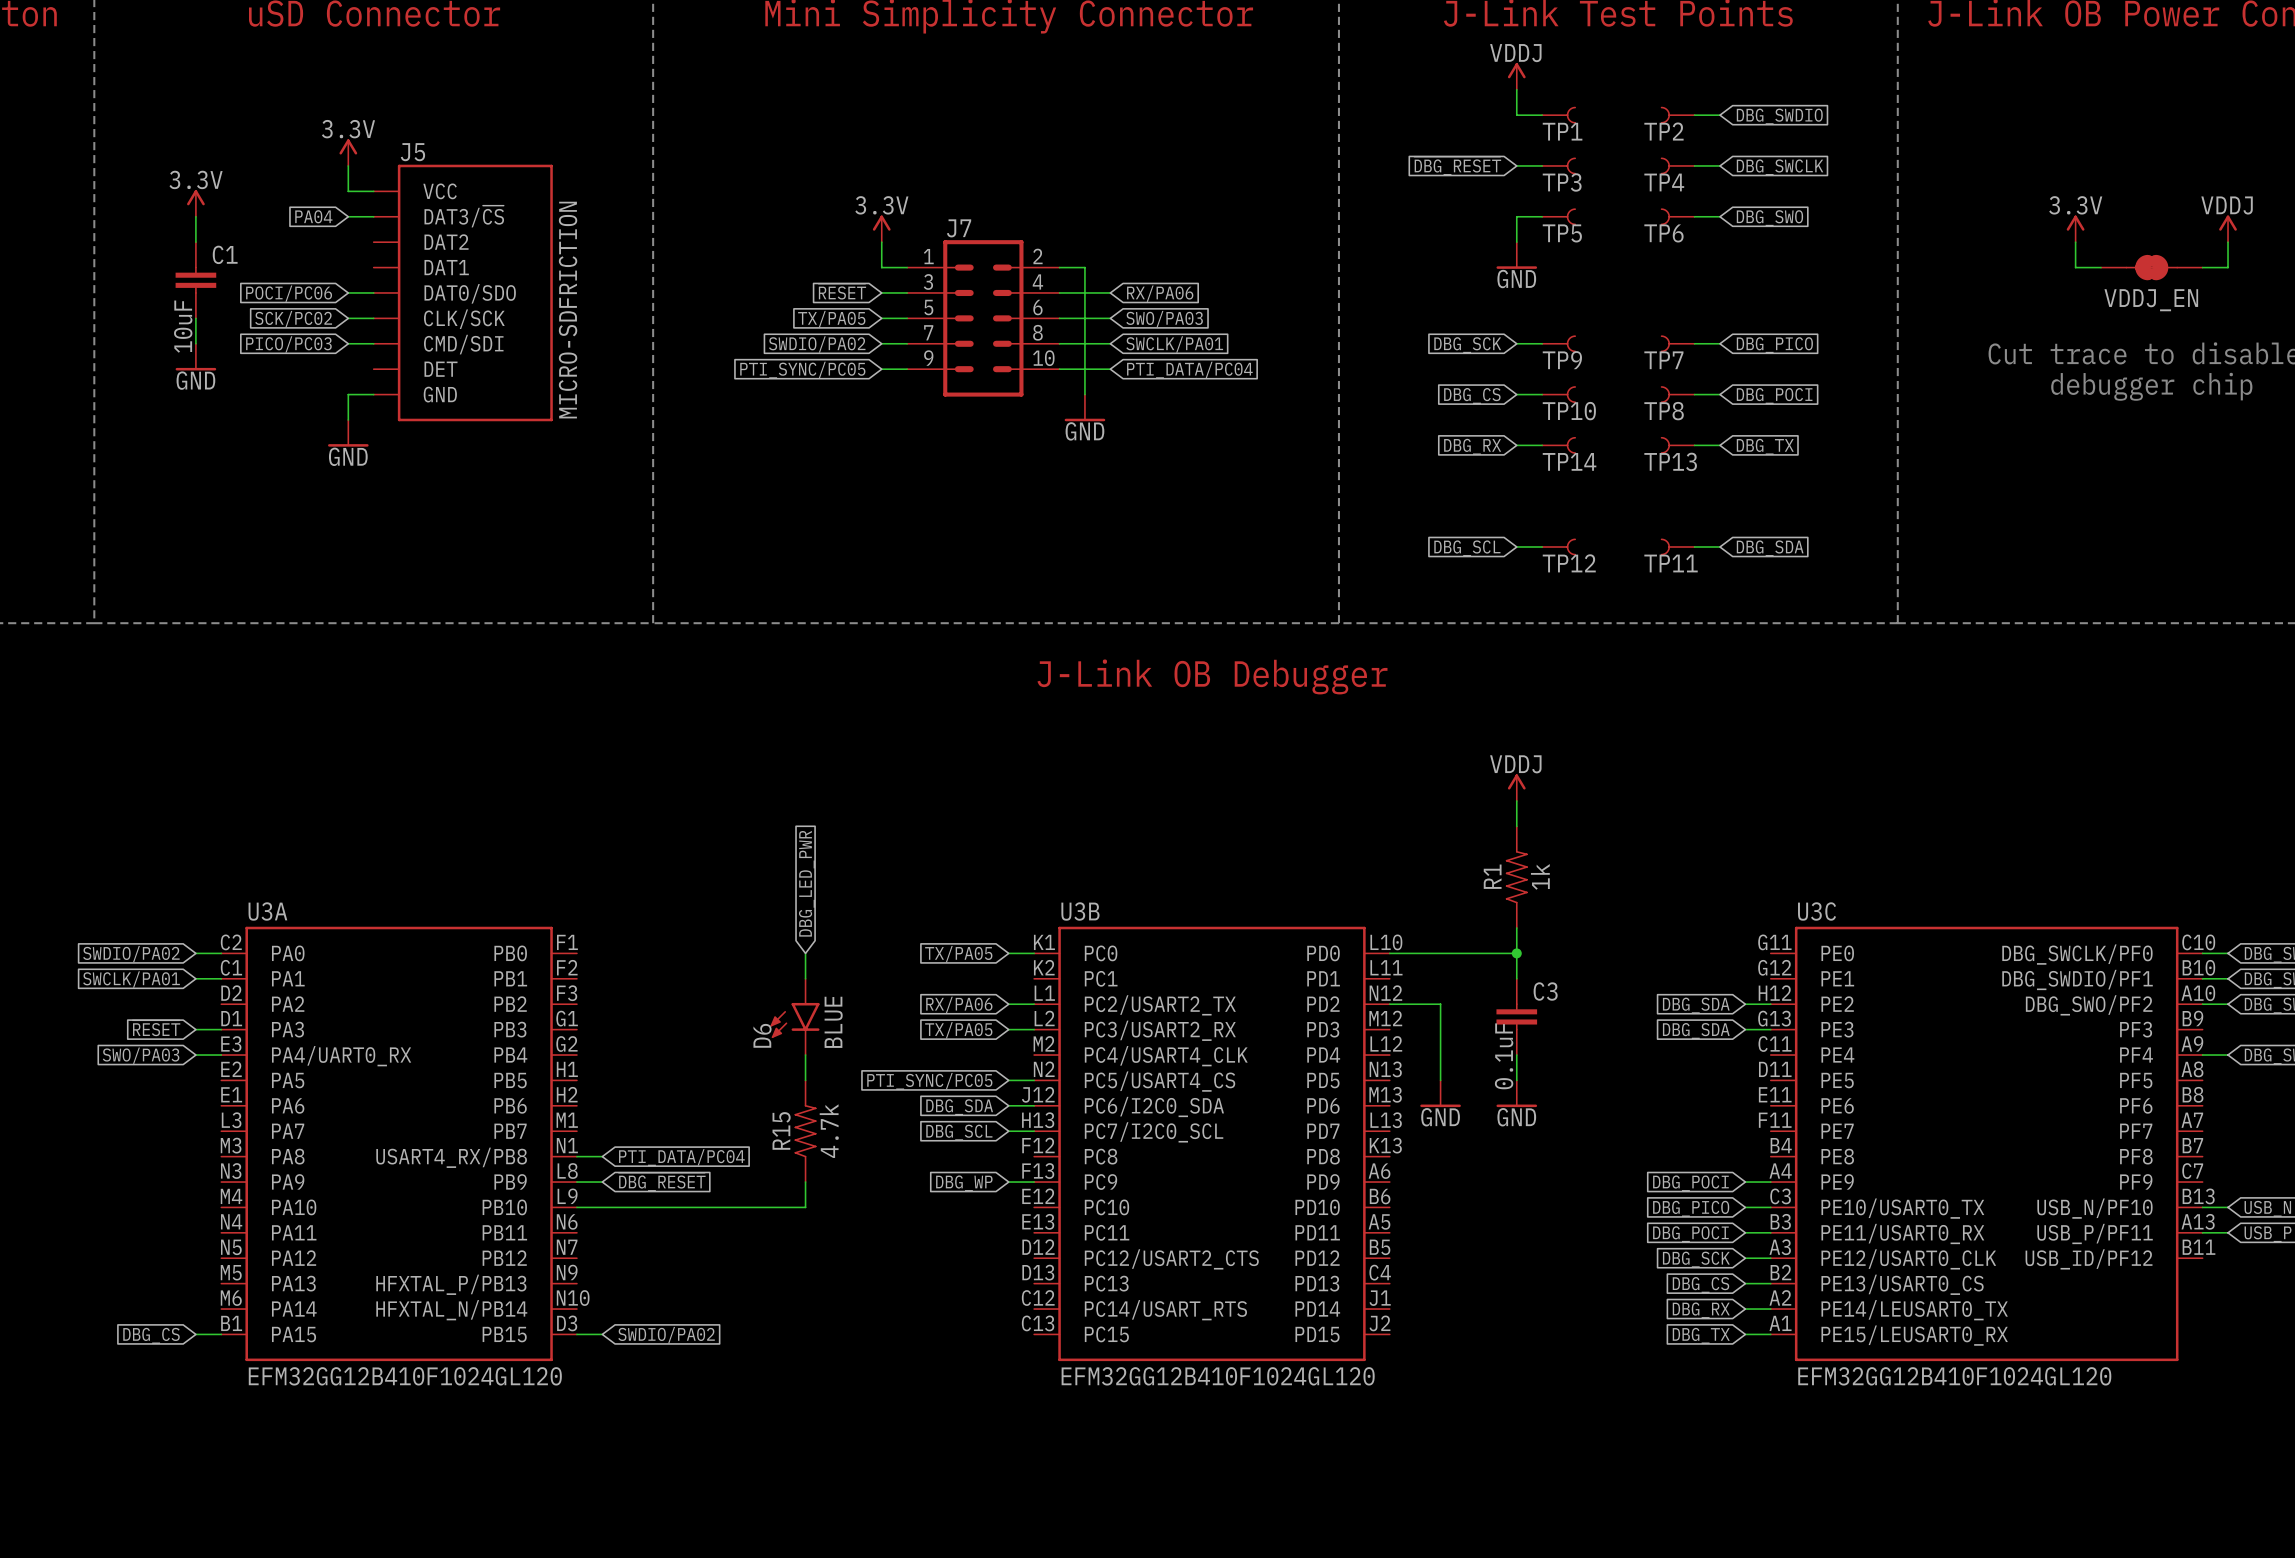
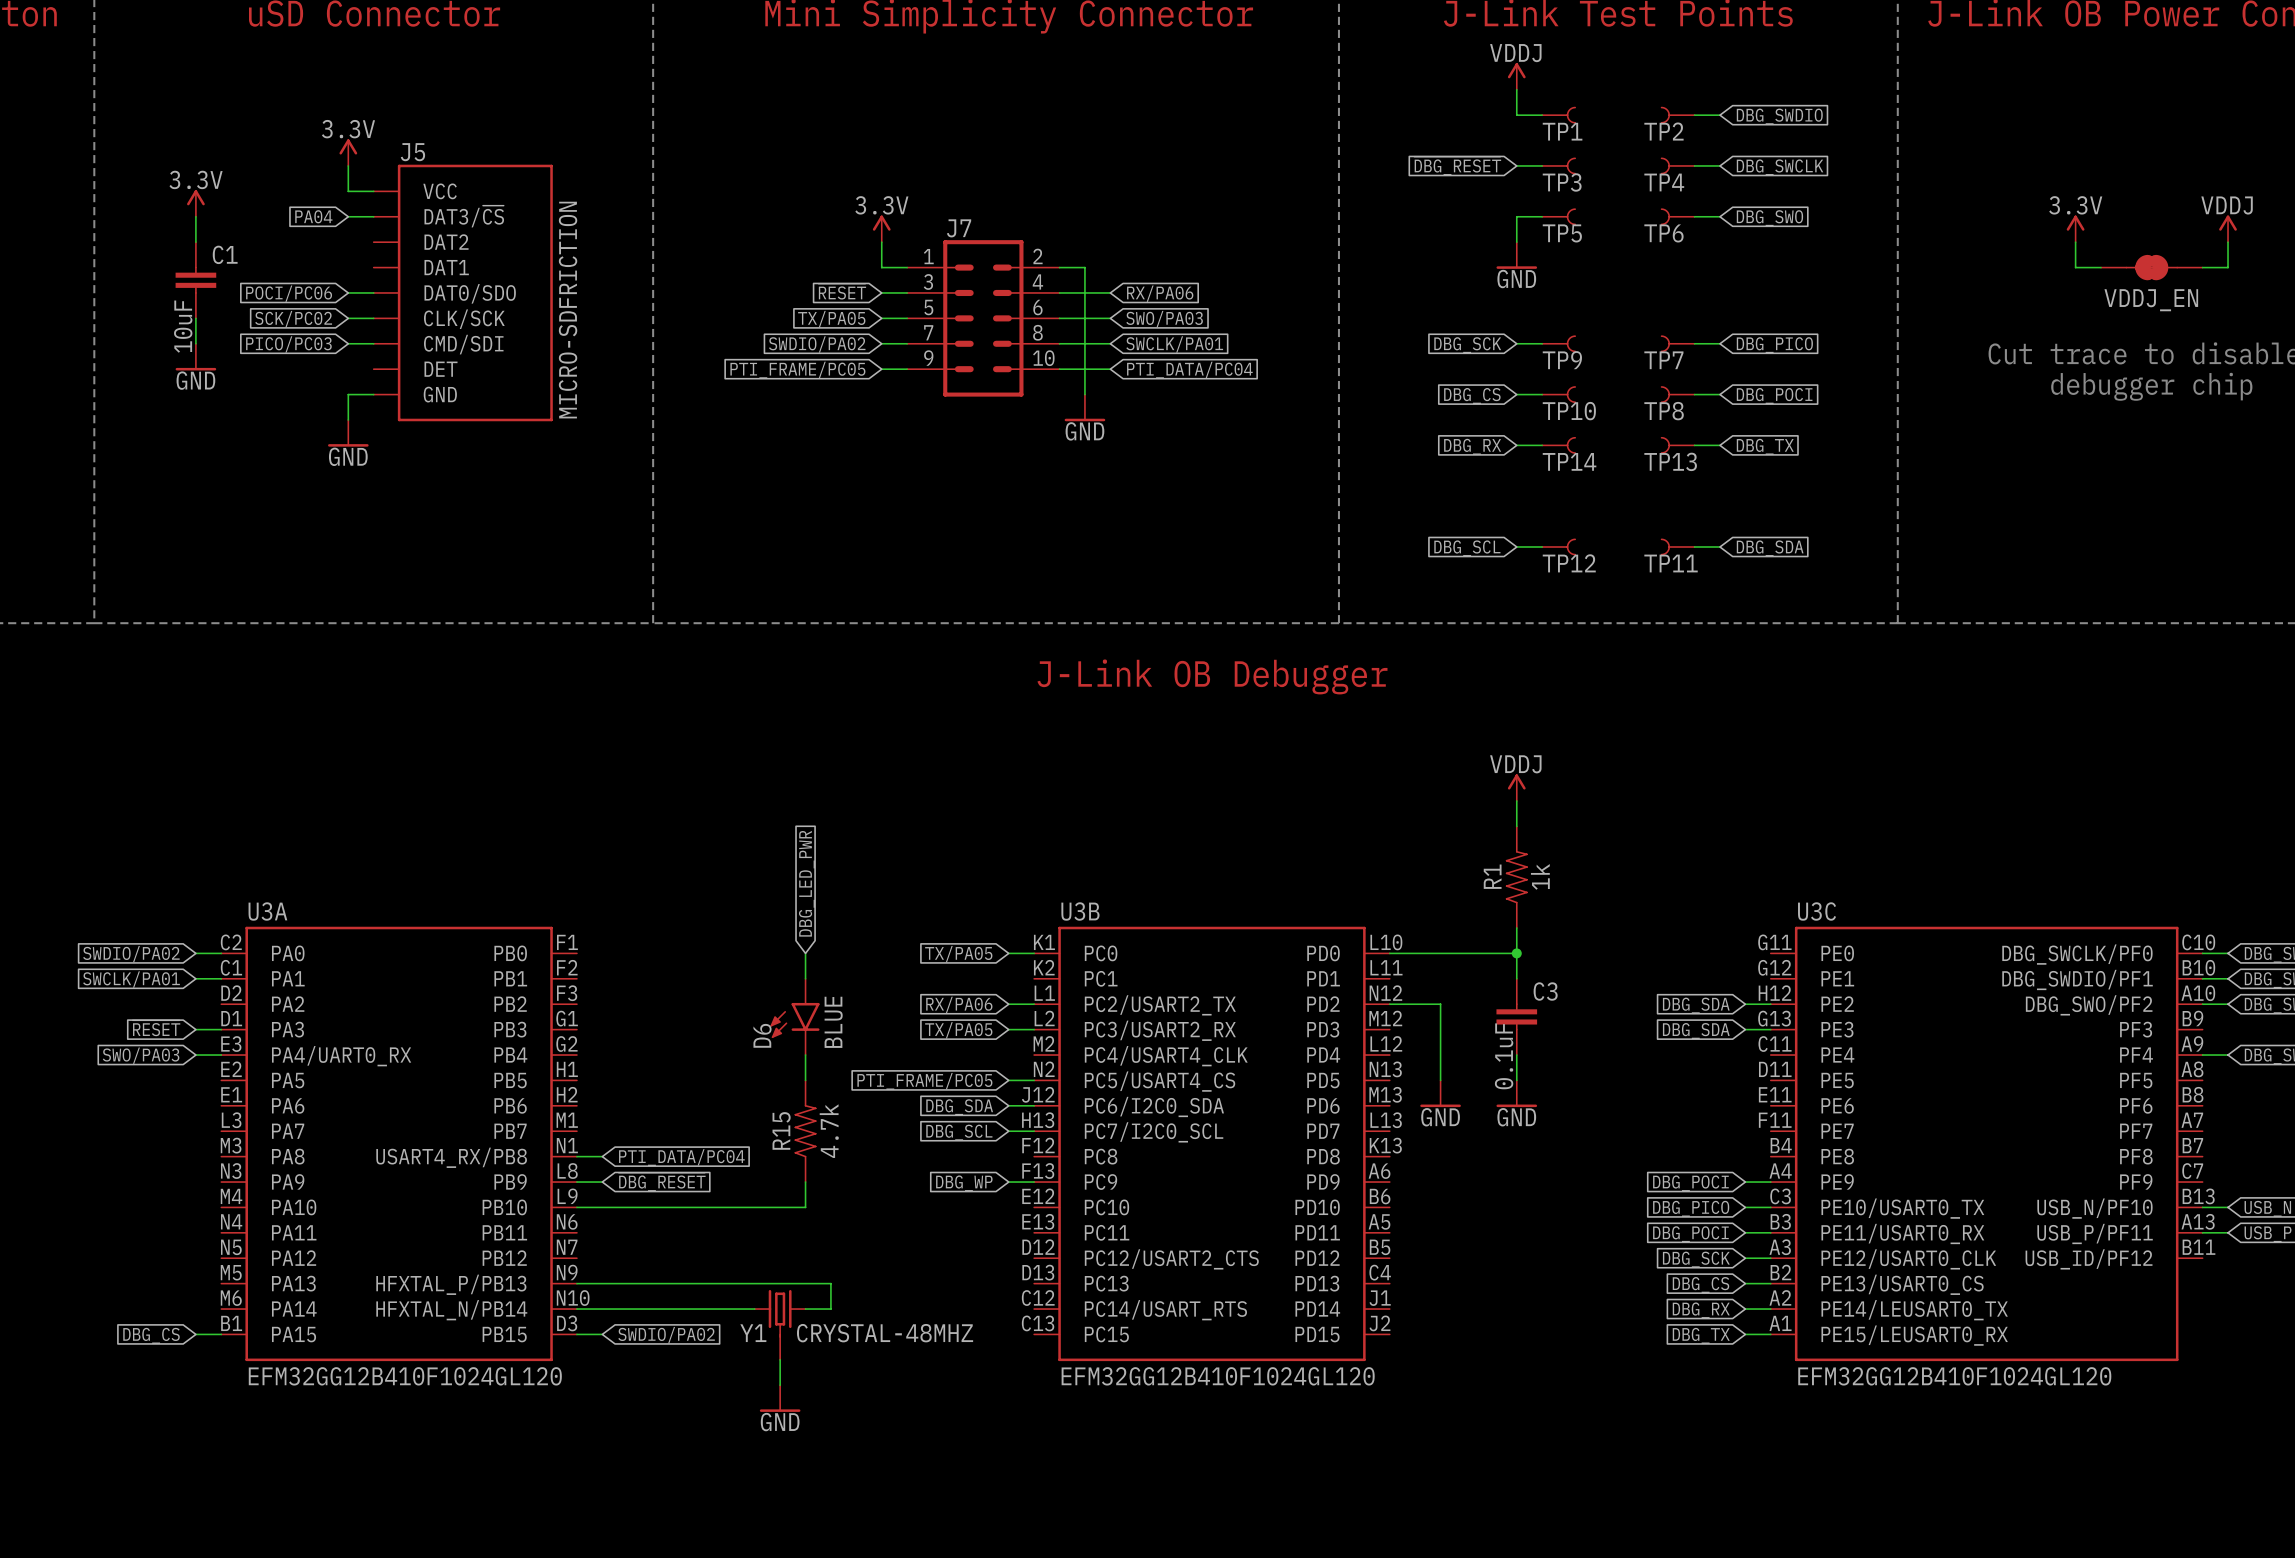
global label: PTI_SYNC/PC05 (802, 370) -> PTI_FRAME/PC05 (797, 370)
global label: PTI_SYNC/PC05 (929, 1081) -> PTI_FRAME/PC05 (924, 1081)
wire: none -> (576, 1283) (830, 1283) (830, 1309) (805, 1309)
wire: none -> (576, 1309) (754, 1309)
Y1: none -> CRYSTAL-48MHZ (780, 1324)
wire: none -> (780, 1359) (780, 1385)
power symbol: none -> GND (780, 1398)

